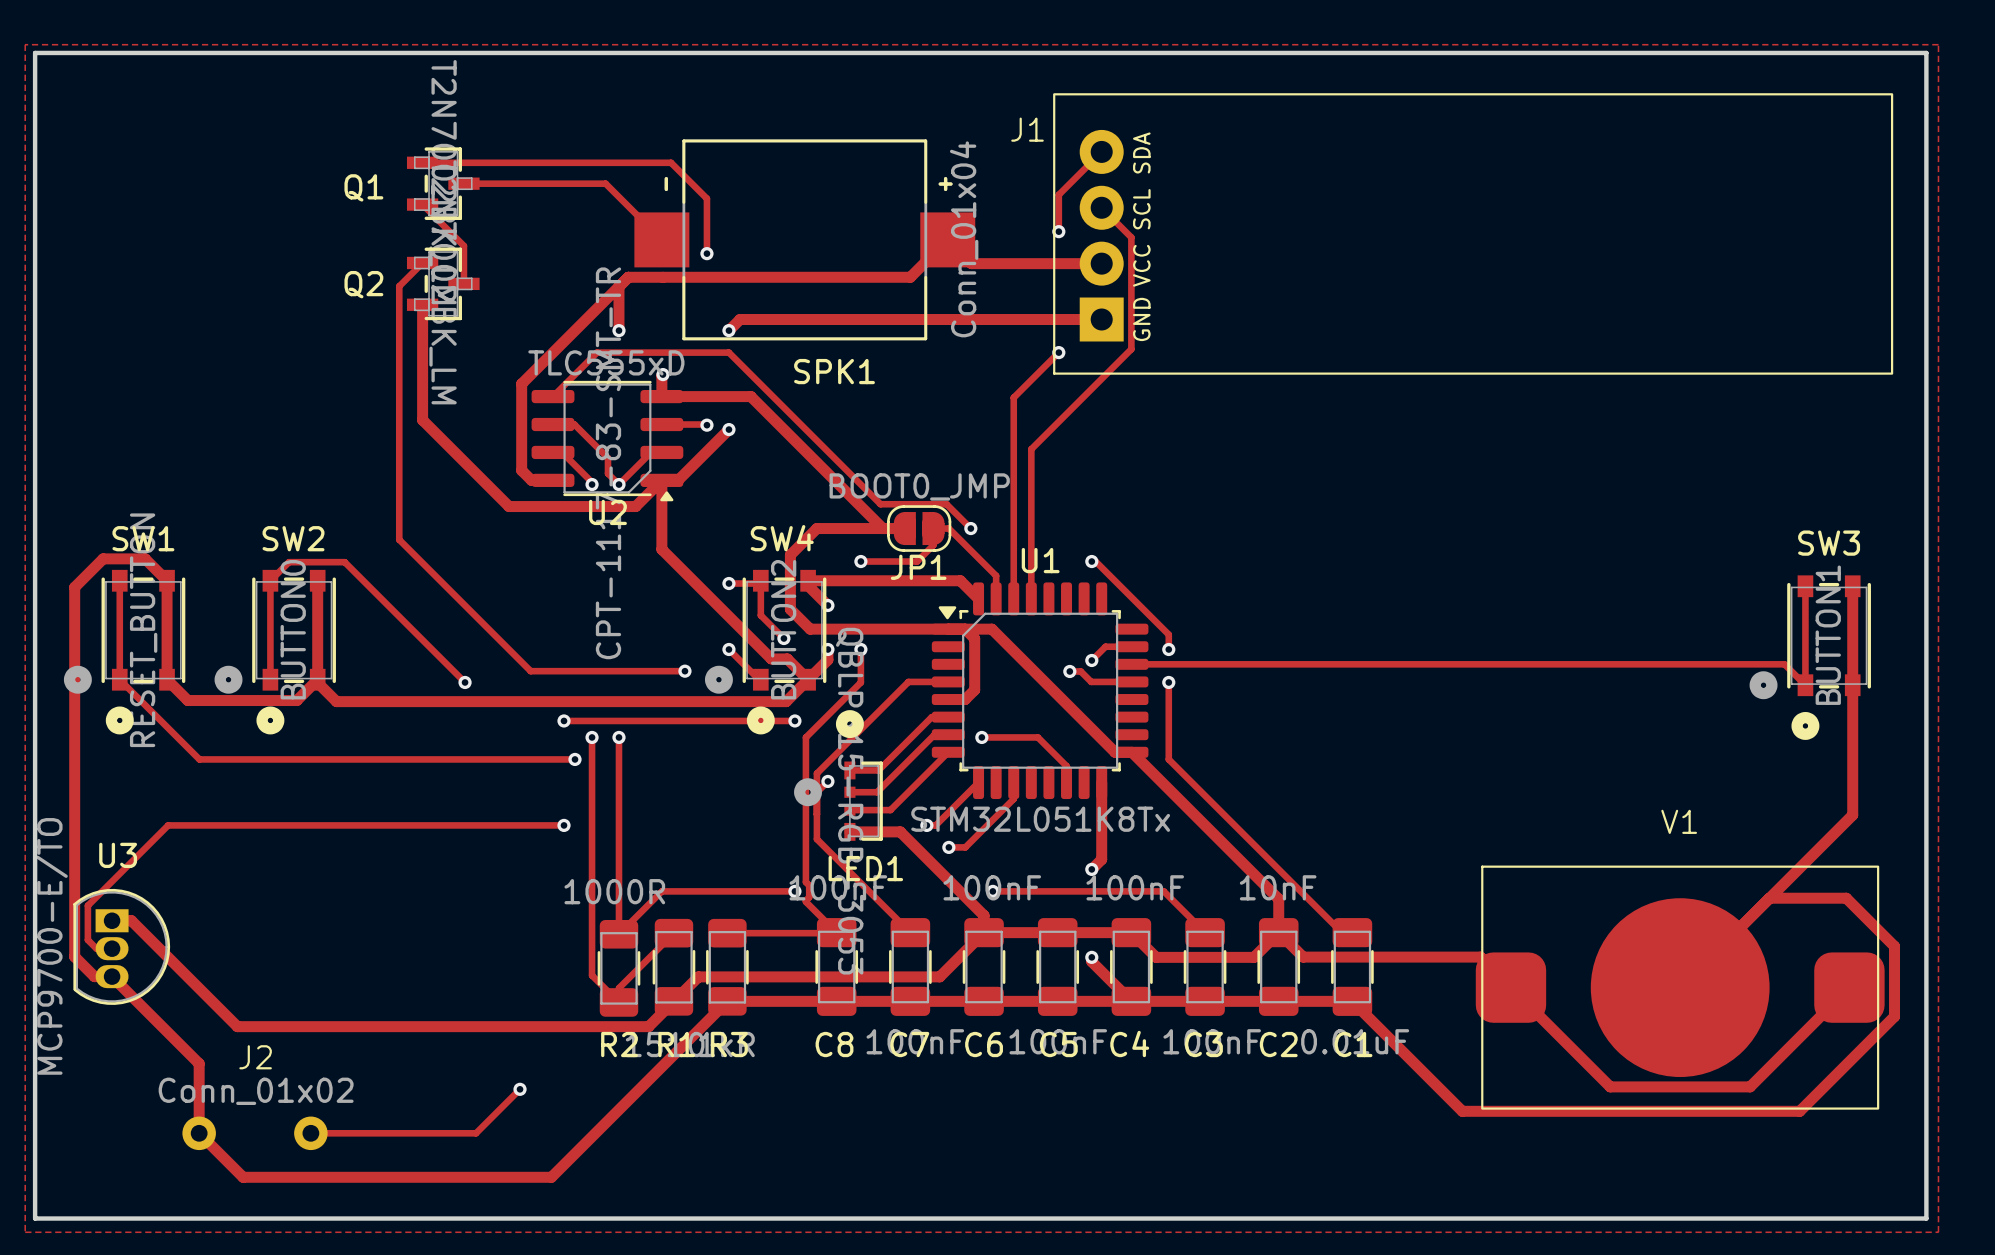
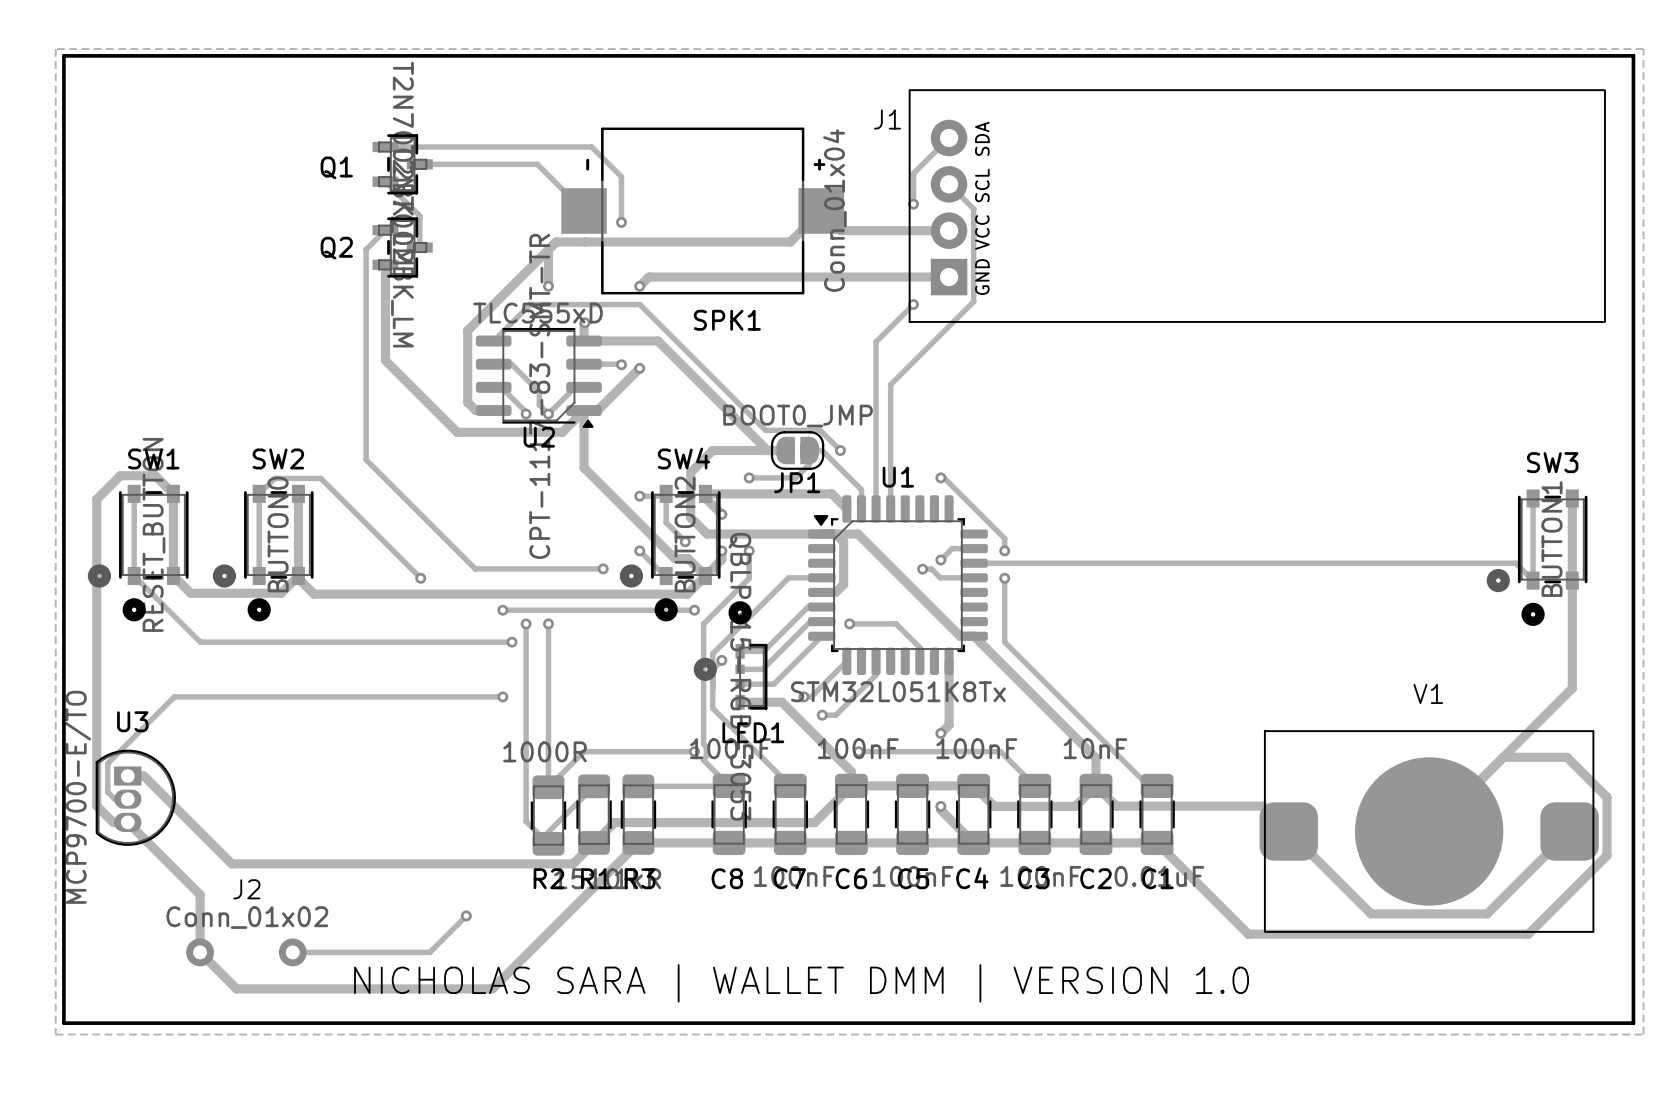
text: none -> NICHOLAS SARA | WALLET DMM | VERSION 1.0 (801, 983)

